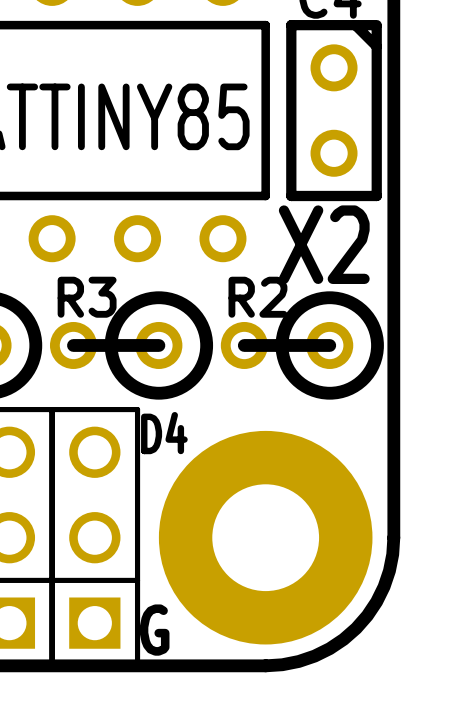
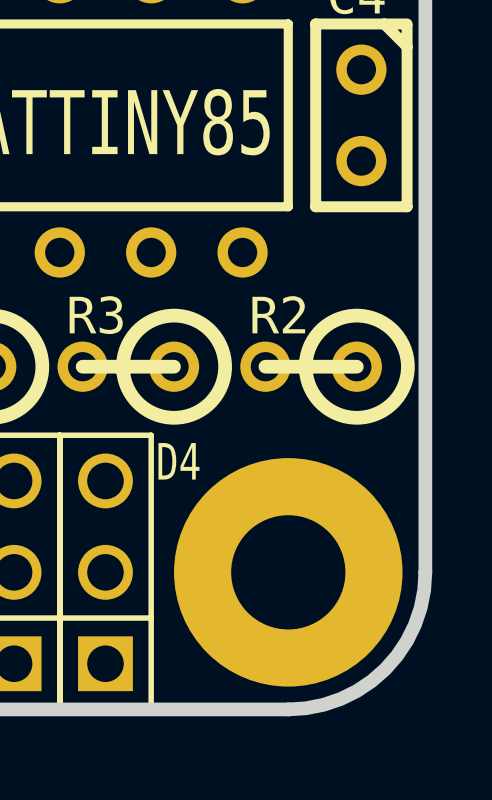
text: X2 (324, 244) -> none
text: G (154, 630) -> none

